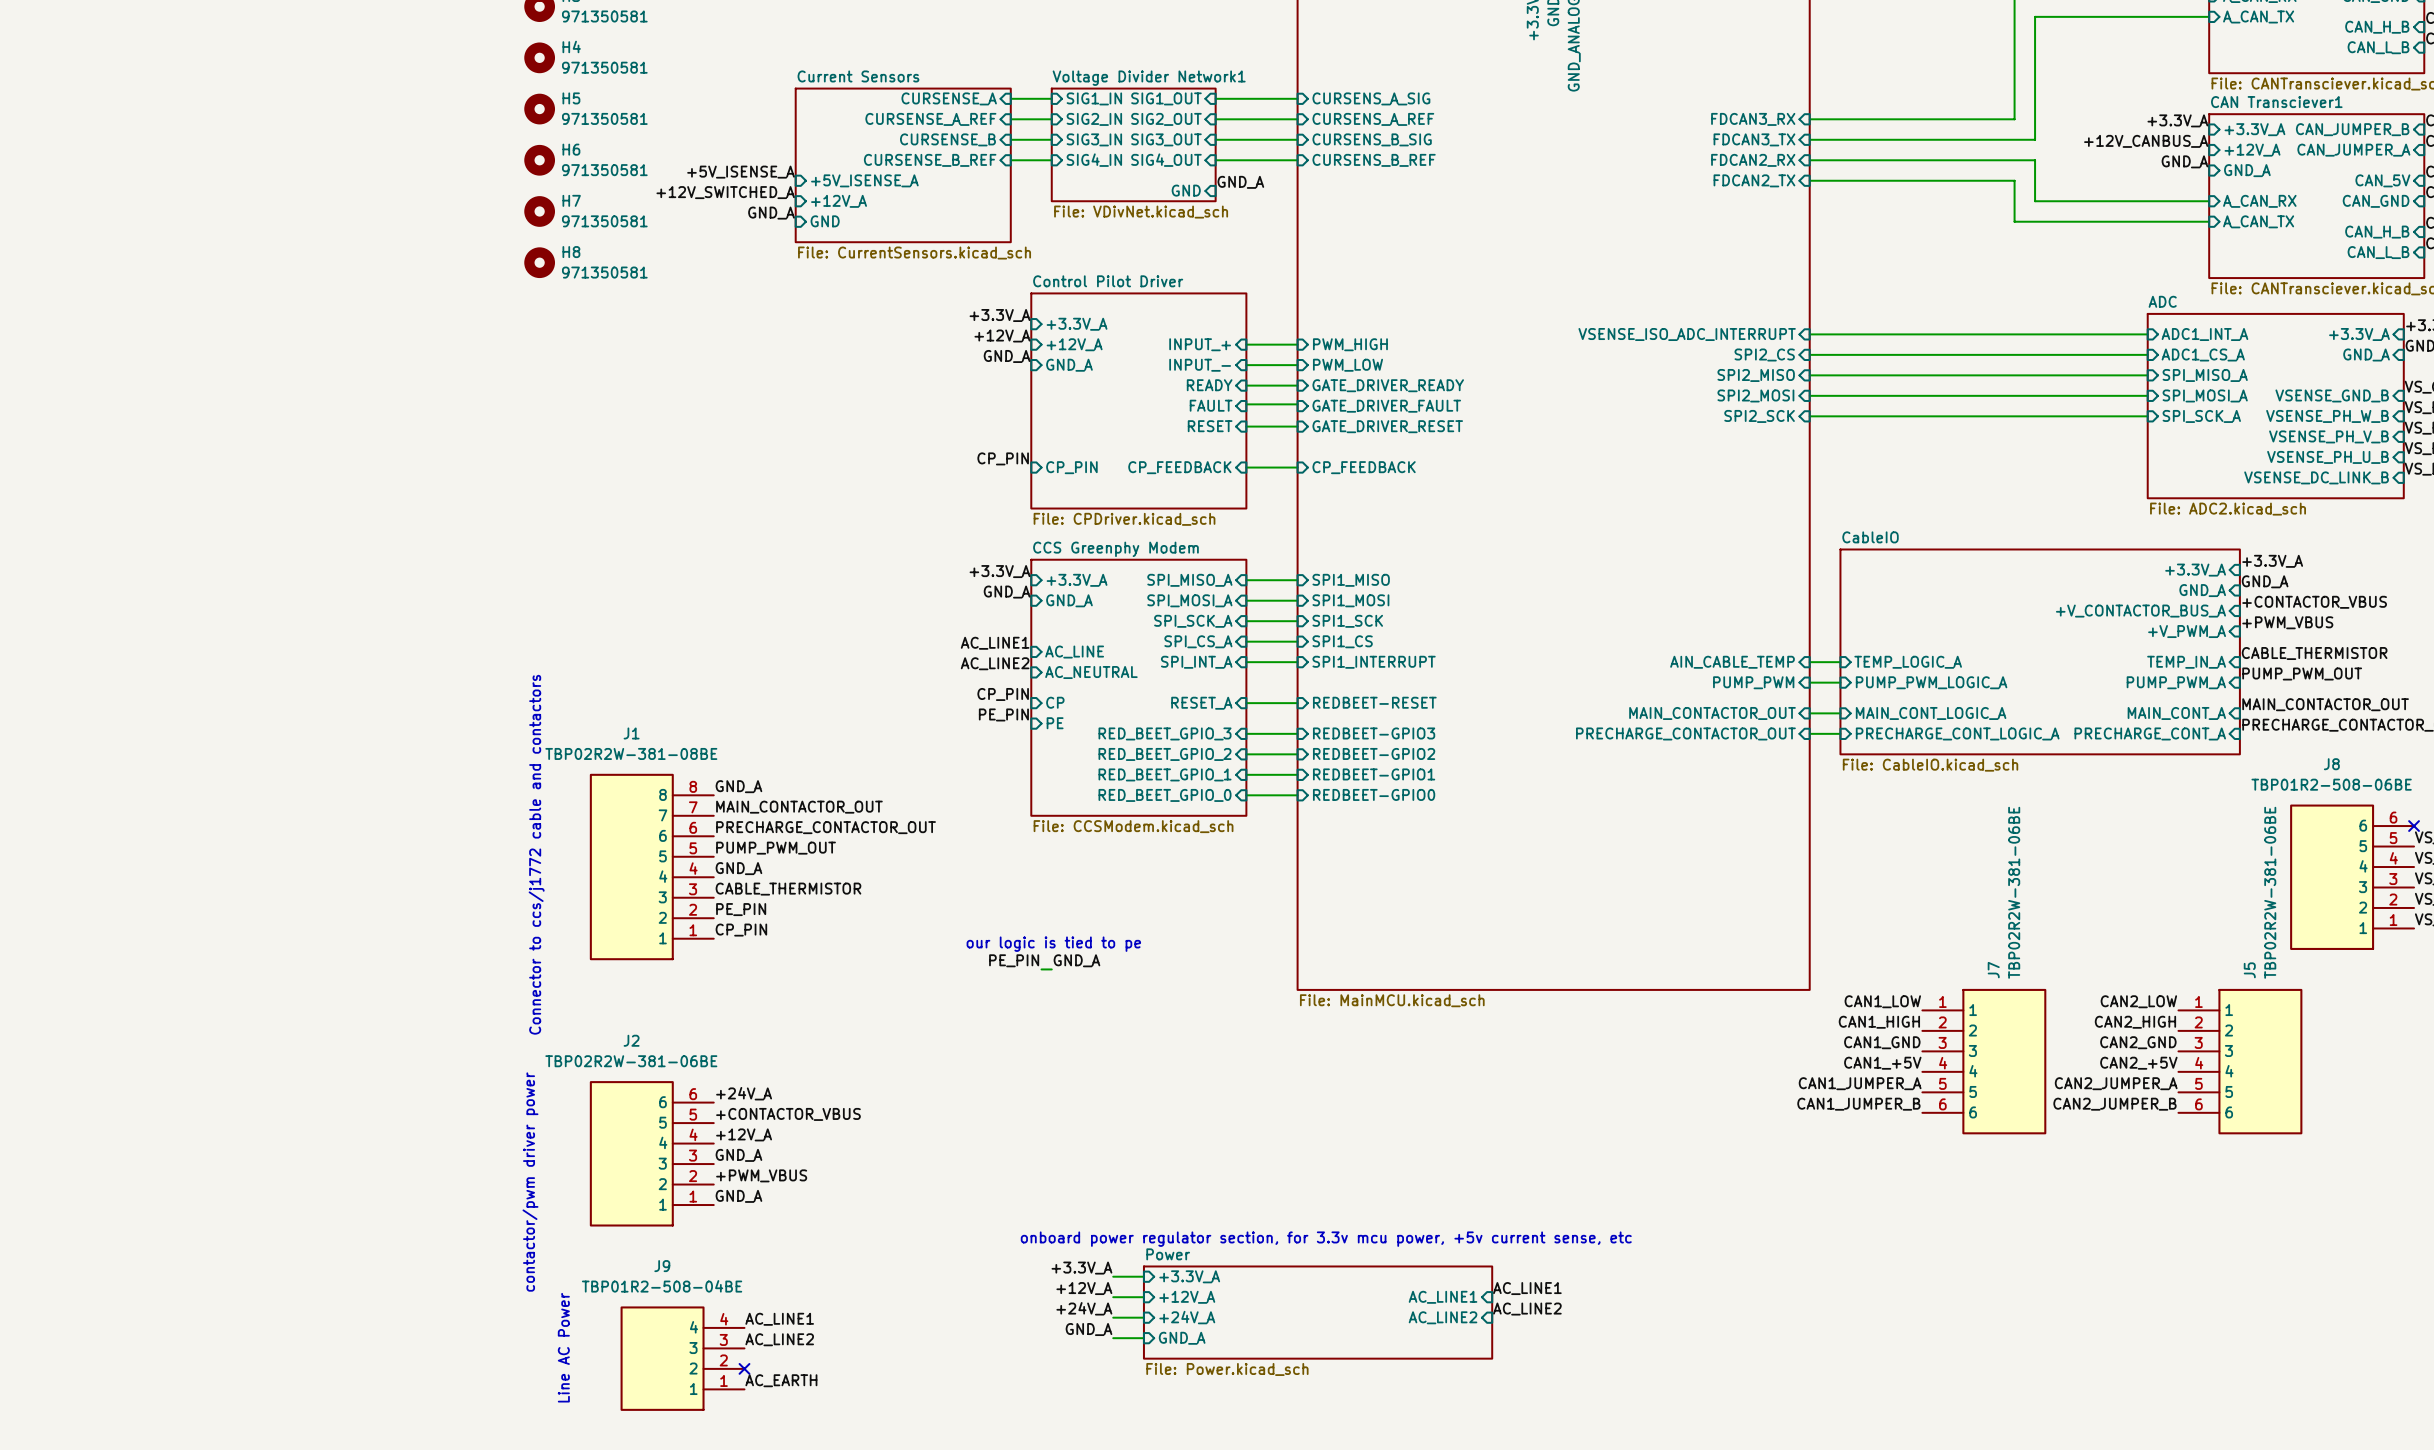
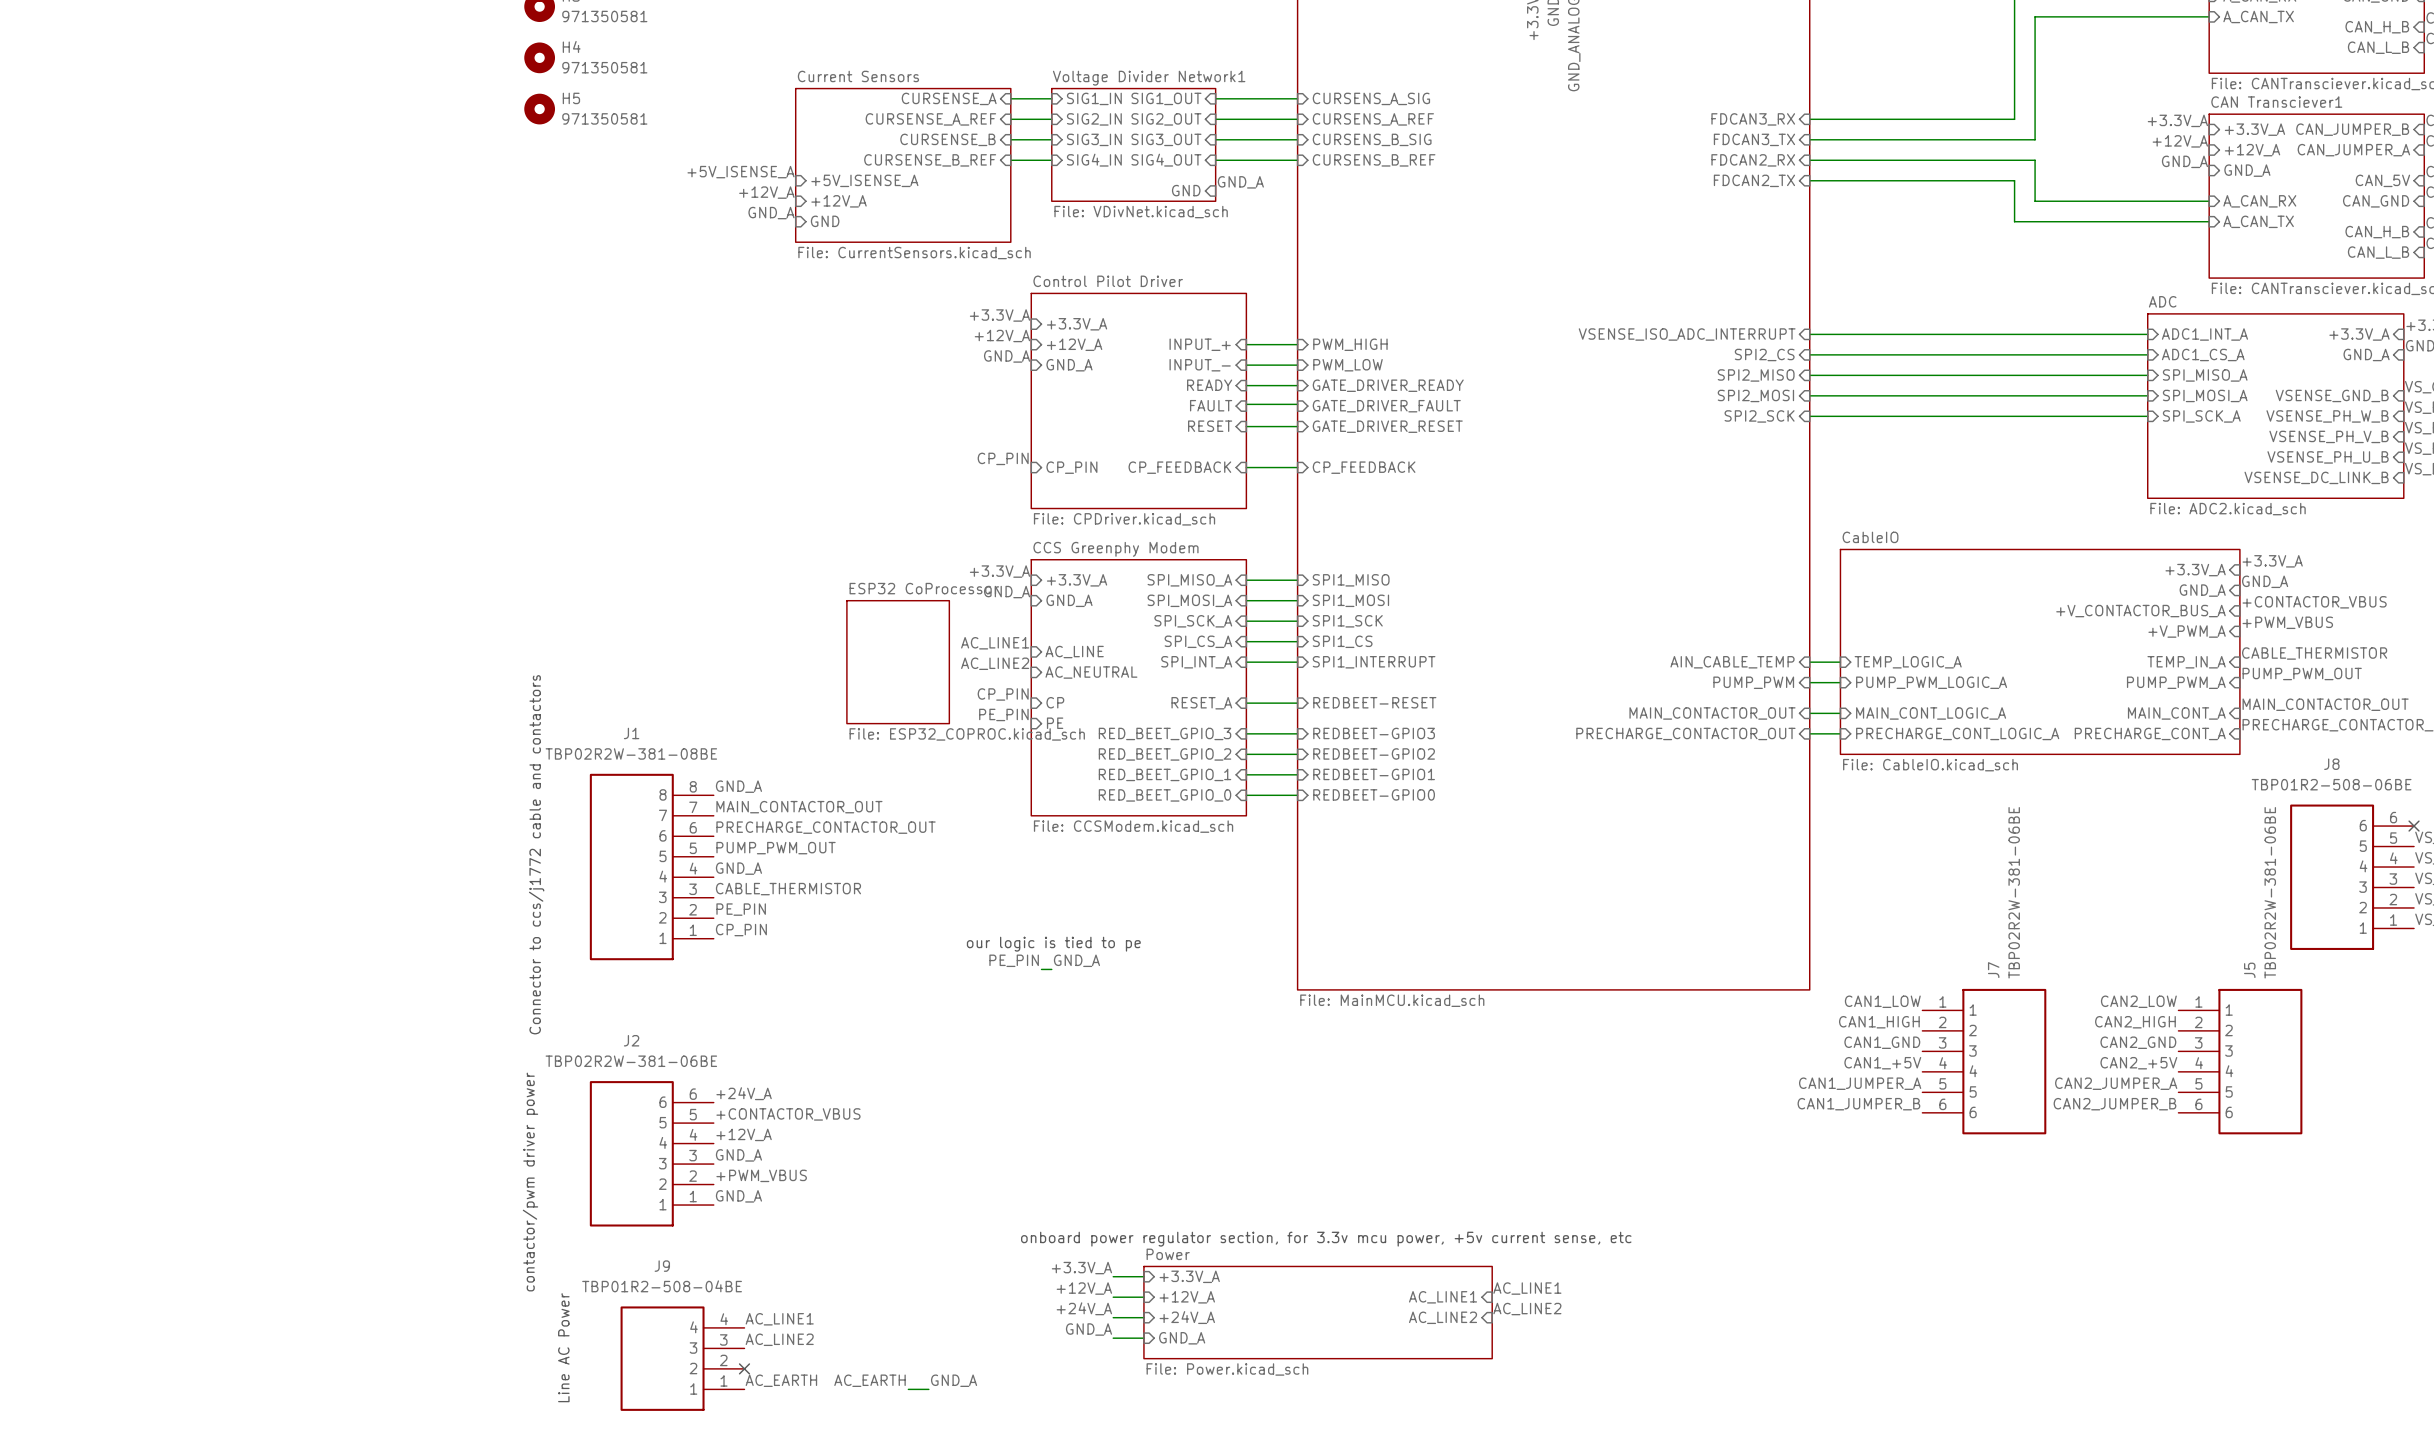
label: +12V_CANBUS_A (2146, 141) -> +12V_A (2180, 141)
H6: 971350581 (539, 160) -> none
label: +12V_SWITCHED_A (725, 192) -> +12V_A (766, 192)
H7: 971350581 (539, 211) -> none
H8: 971350581 (539, 262) -> none
sheet ESP32 CoProcessor: none -> File: ESP32_COPROC.kicad_sch (898, 662)
label: none -> AC_EARTH (870, 1380)
label: none -> GND_A (954, 1380)
wire: none -> (908, 1389) (928, 1389)

